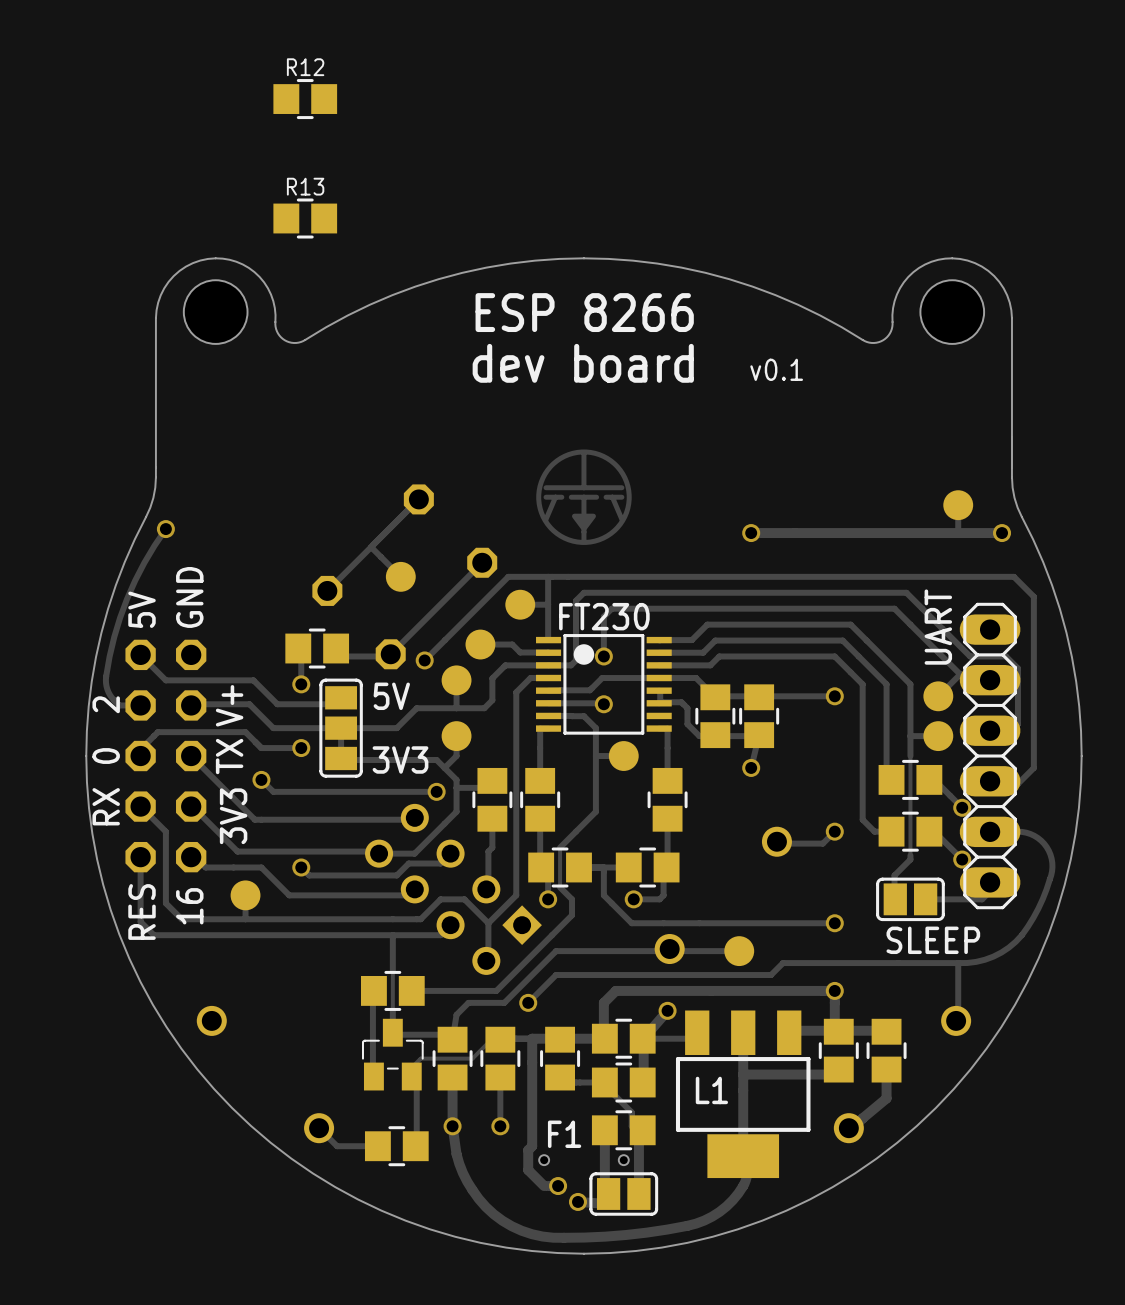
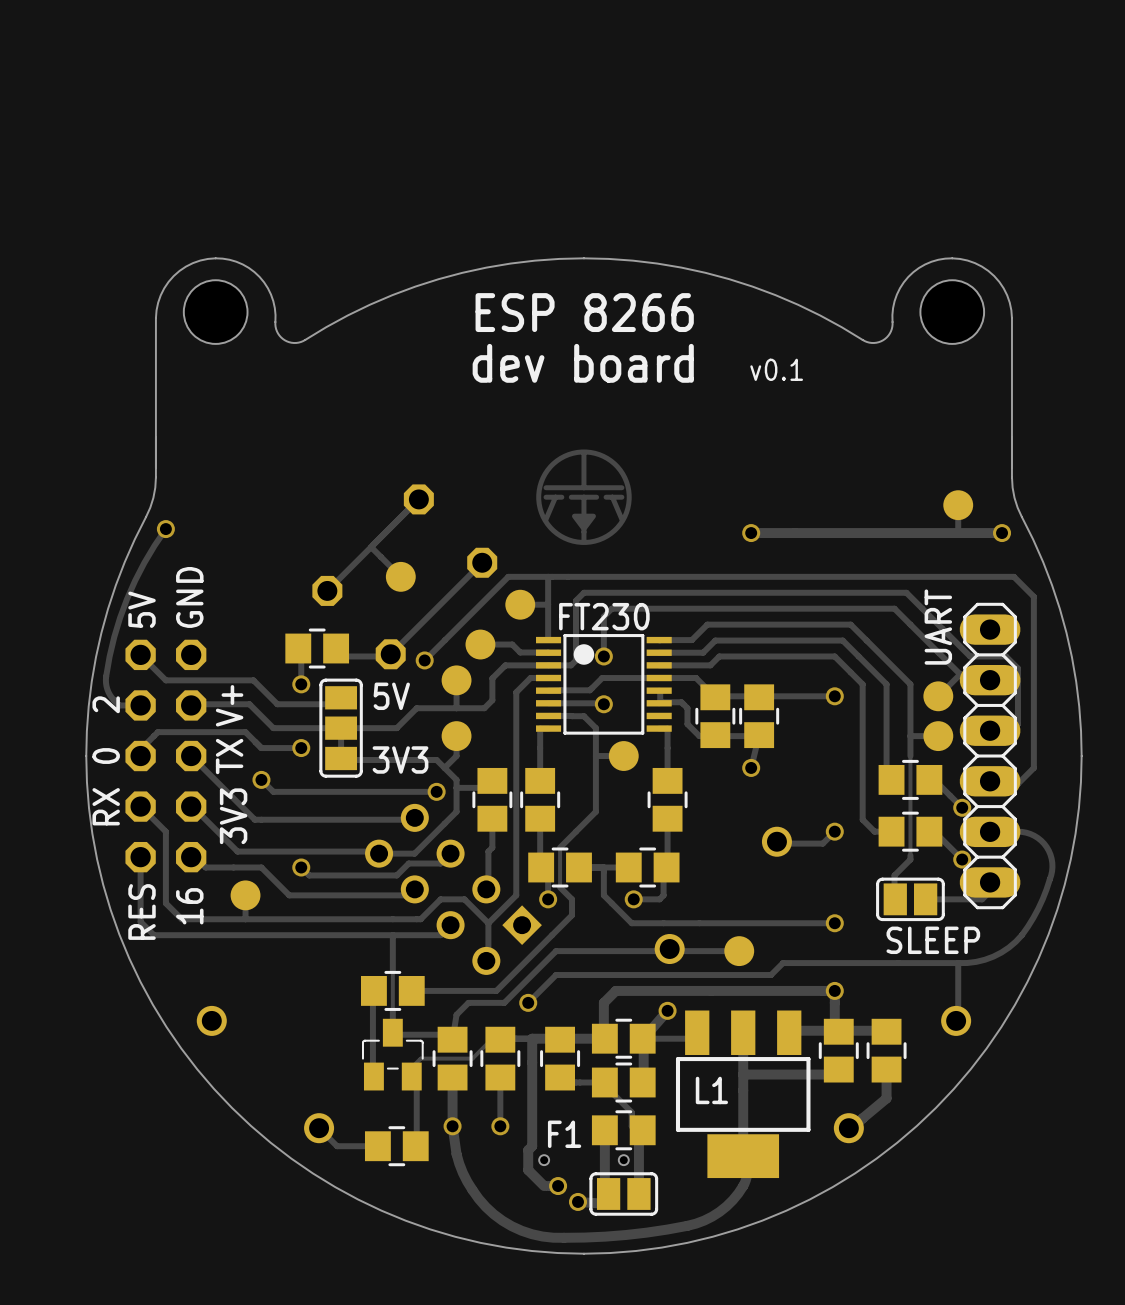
R12: (305, 99) -> none
R13: (305, 218) -> none

